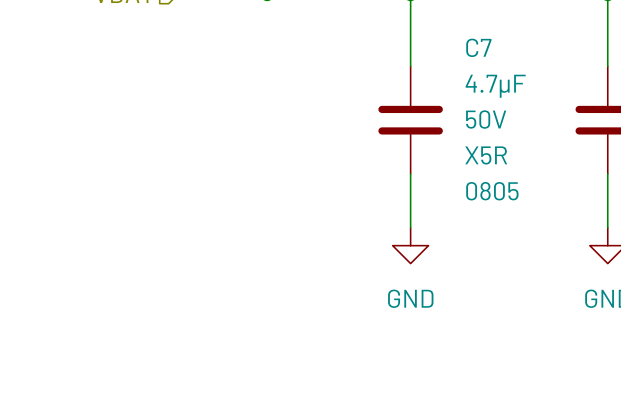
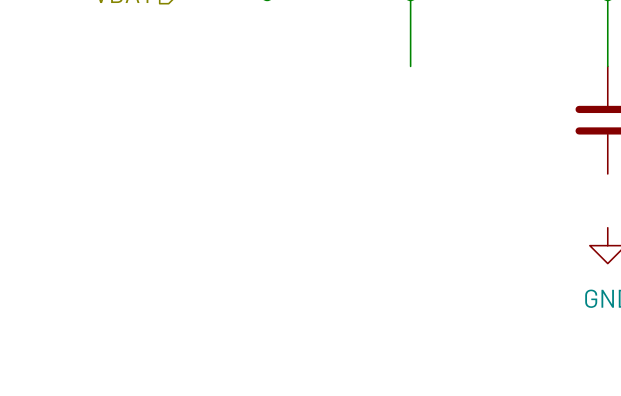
C7: (410, 120) -> none
wire: (410, 173) (410, 227) -> none
wire: (607, 173) (607, 227) -> none
power symbol: GND (410, 245) -> none

